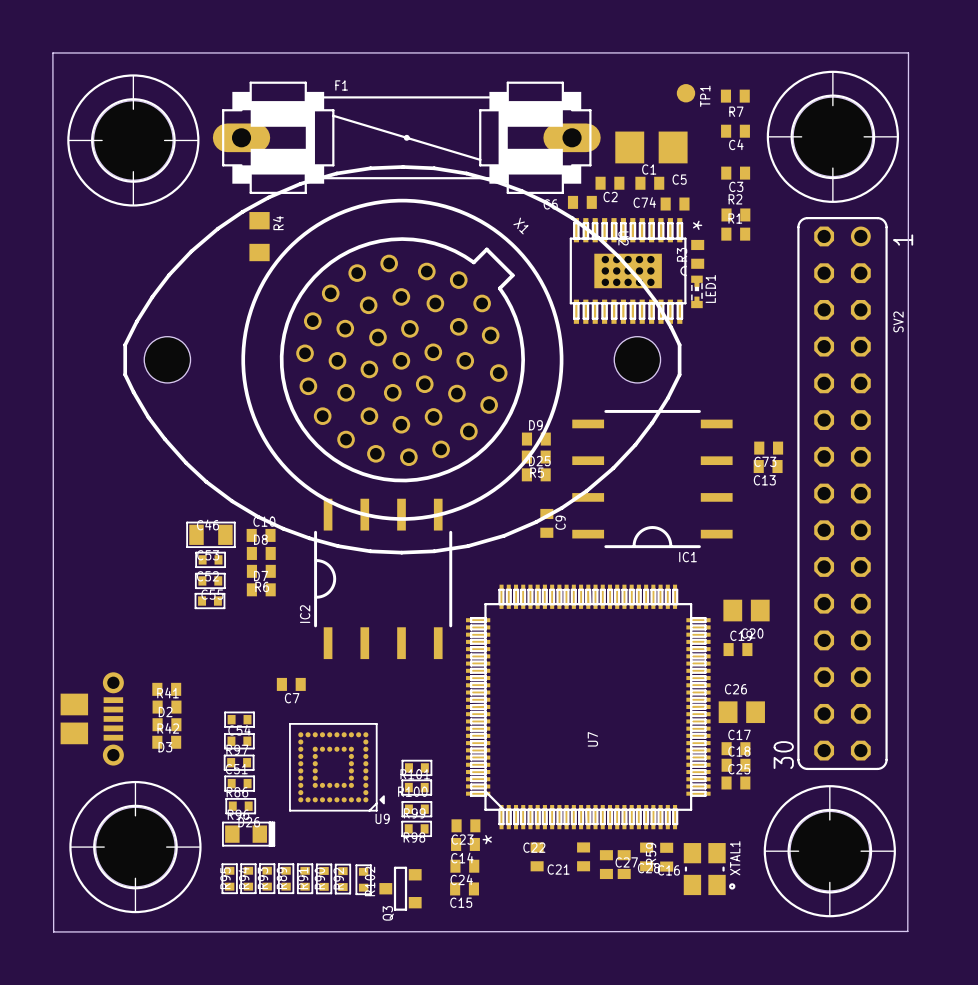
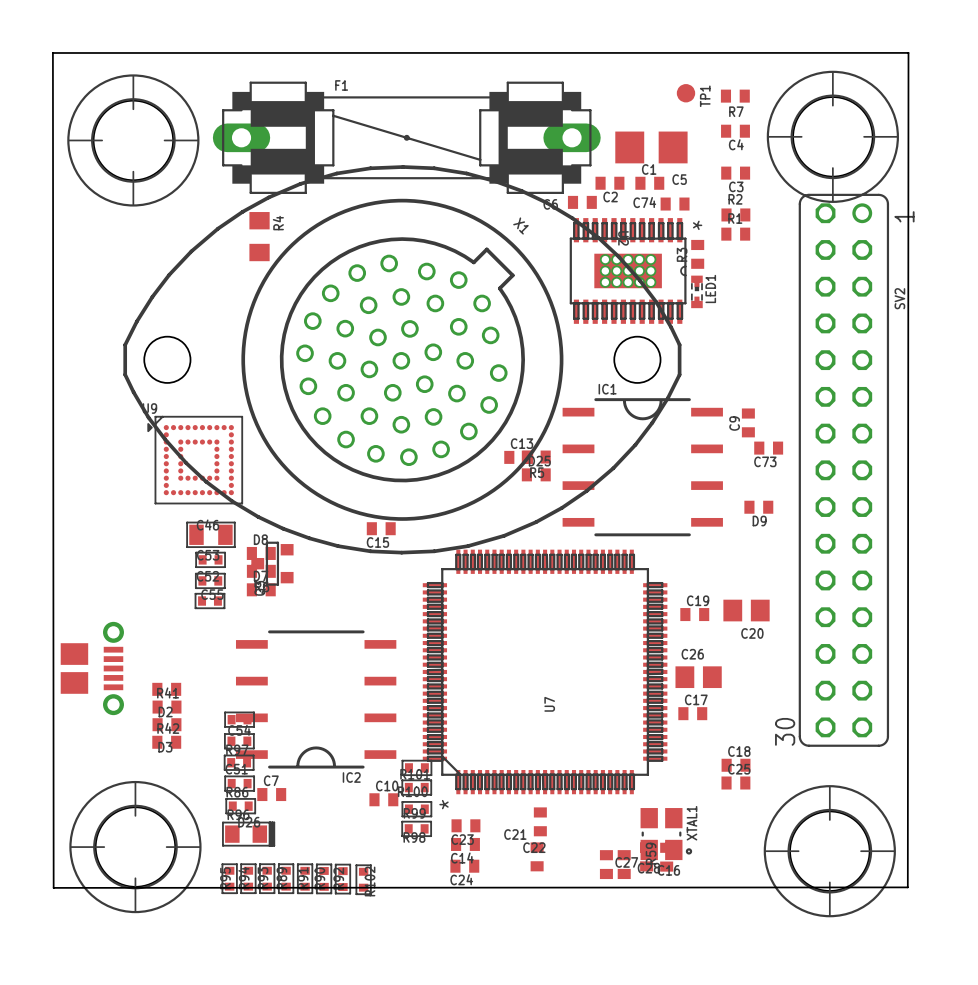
board edge: (908, 52) (907, 931) (53, 931) (53, 887) -> (908, 52) (907, 887) (53, 887)
D9 name position: D9 (535, 425) -> D9 (759, 521)
D9 position: (536, 439) -> (758, 507)
C13 position: (768, 466) -> (518, 457)
IC1 rotation: 0° (652, 479) -> 180° (642, 467)
C13 name position: C13 (764, 480) -> C13 (522, 443)
SV2 position: (842, 493) -> (843, 470)
C9 name position: C9 (560, 522) -> C9 (734, 423)
C9 position: (546, 523) -> (748, 422)
C10 position: (261, 535) -> (383, 799)
IC2 rotation: 0° (383, 578) -> 90° counterclockwise (316, 699)
IC2 position: (383, 578) -> (316, 699)
C19 position: (737, 649) -> (694, 614)
C7 position: (291, 684) -> (271, 794)
C7 name position: C7 (292, 698) -> C7 (271, 780)
U7 position: (588, 706) -> (545, 671)
C26 position: (741, 712) -> (698, 677)
part position: (92, 718) -> (92, 668)
C17 position: (736, 748) -> (692, 713)
U9 rotation: 0° (336, 767) -> 180° (195, 460)
U9 position: (336, 767) -> (195, 460)
C21 position: (583, 856) -> (540, 821)
XTAL1 position: (709, 869) -> (666, 834)
Q3 position: (400, 888) -> (272, 563)
C15 position: (464, 888) -> (381, 528)

